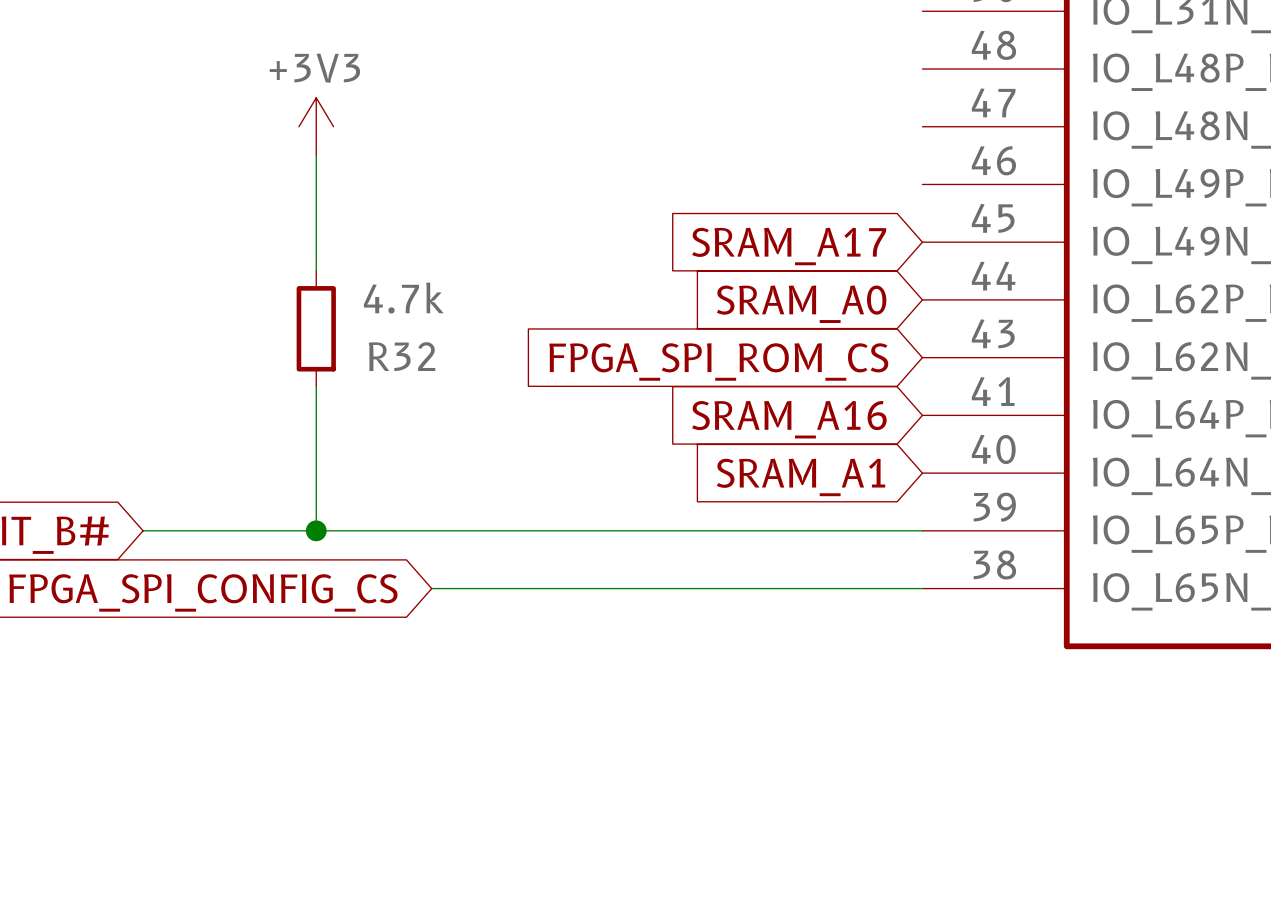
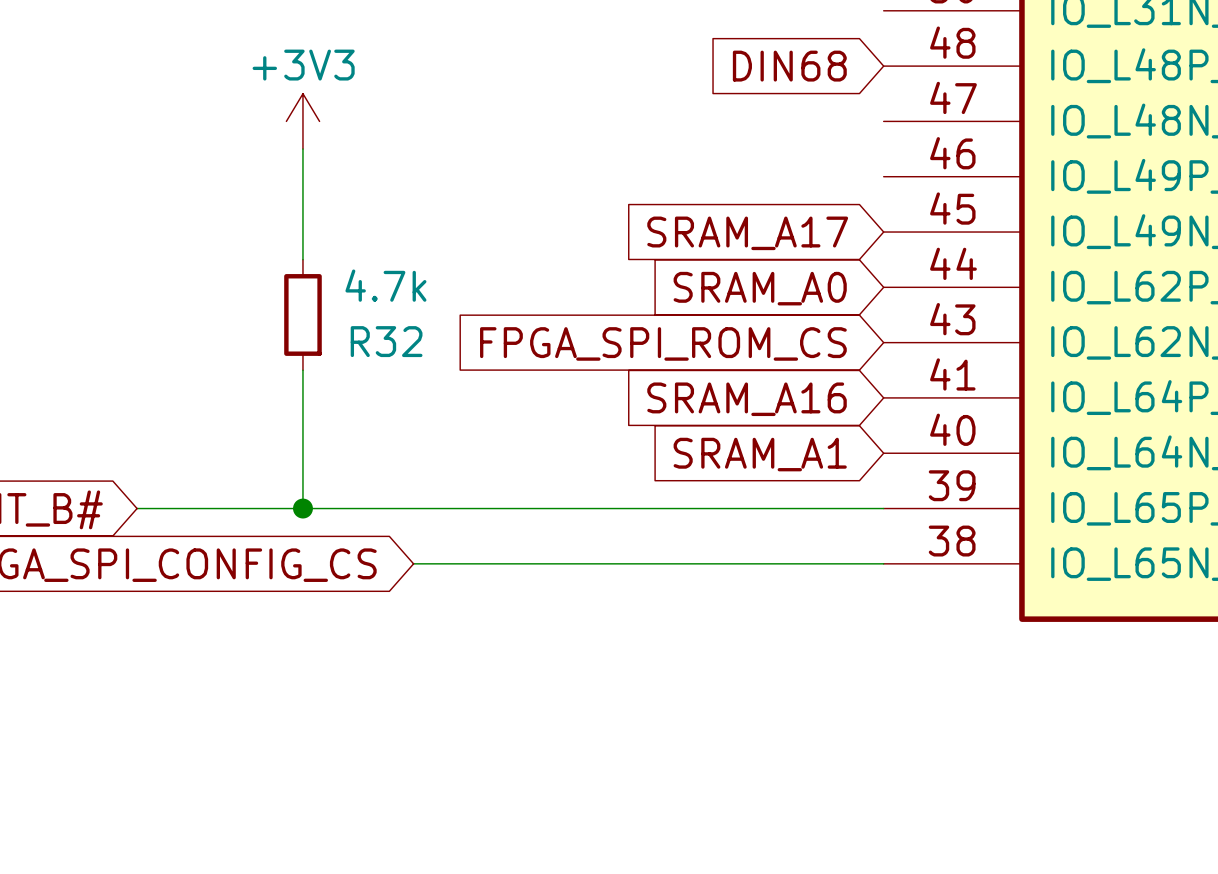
global label: none -> DIN68 (789, 66)

